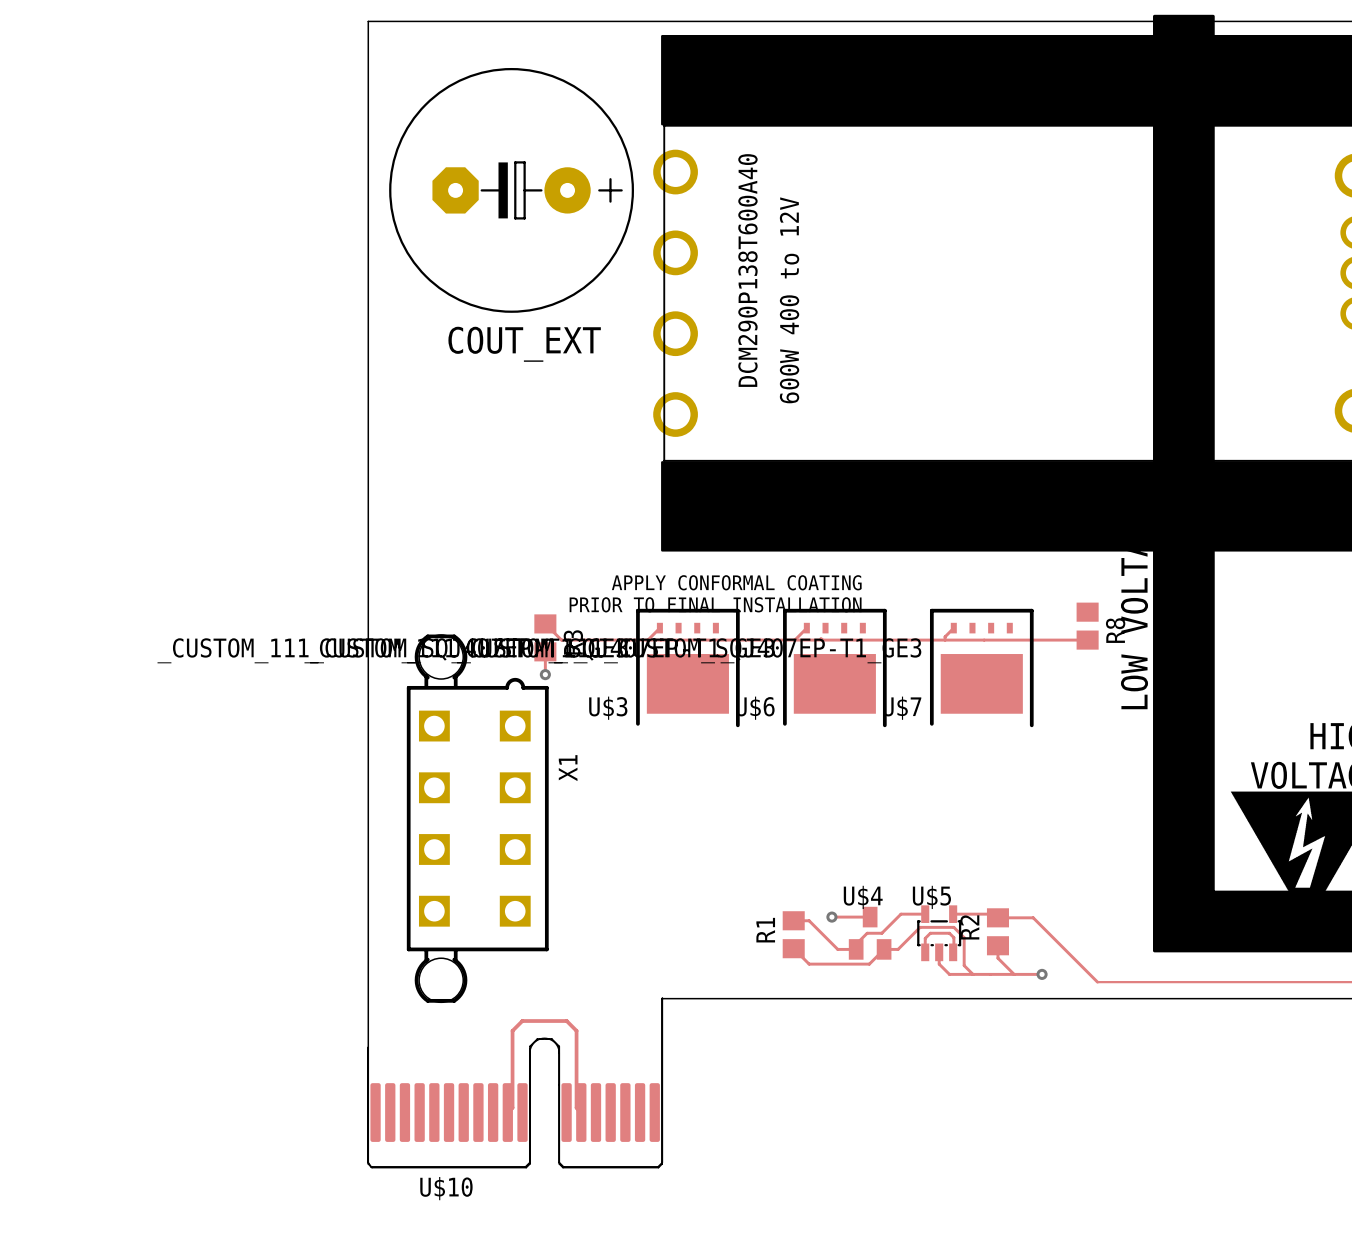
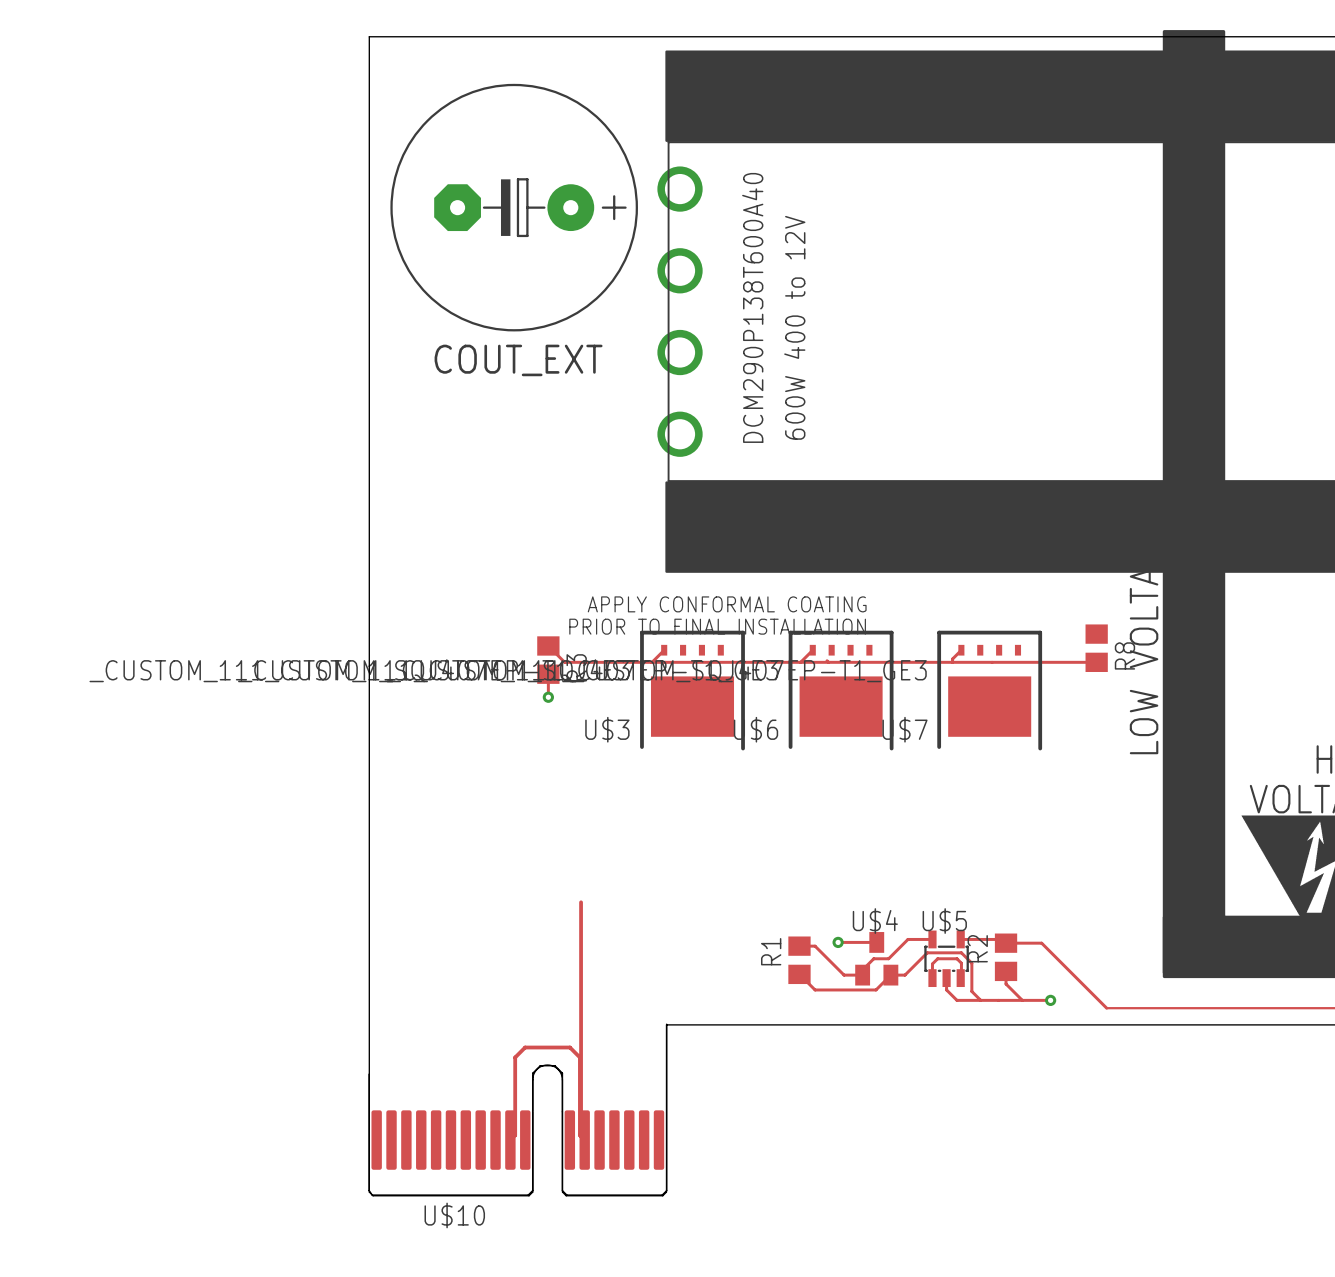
X1: (477, 818) -> none
track: none -> (581, 902) (581, 1136)

